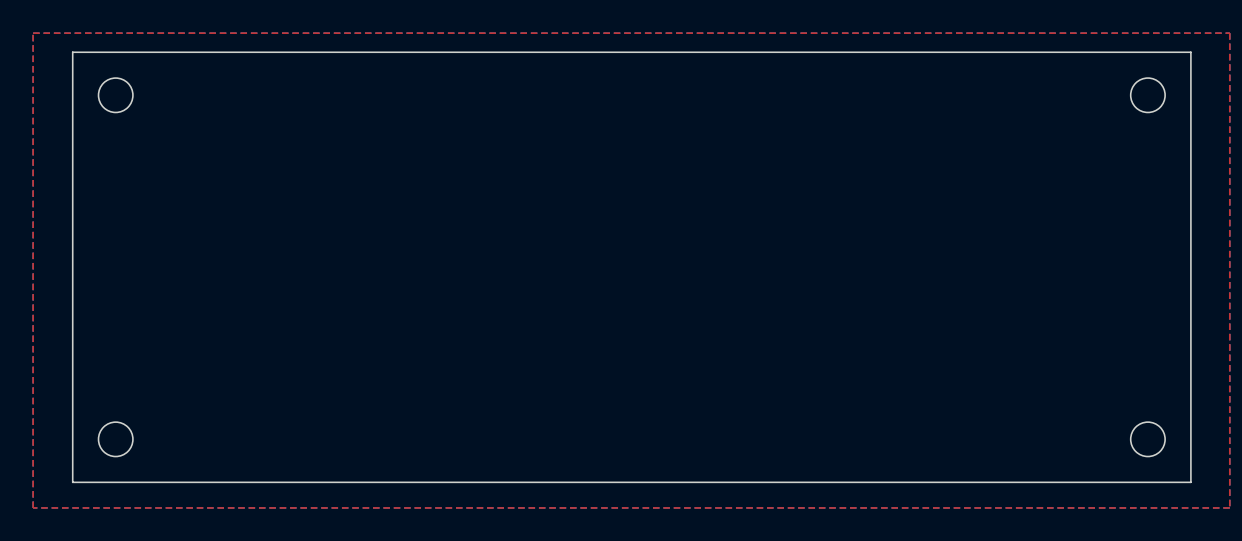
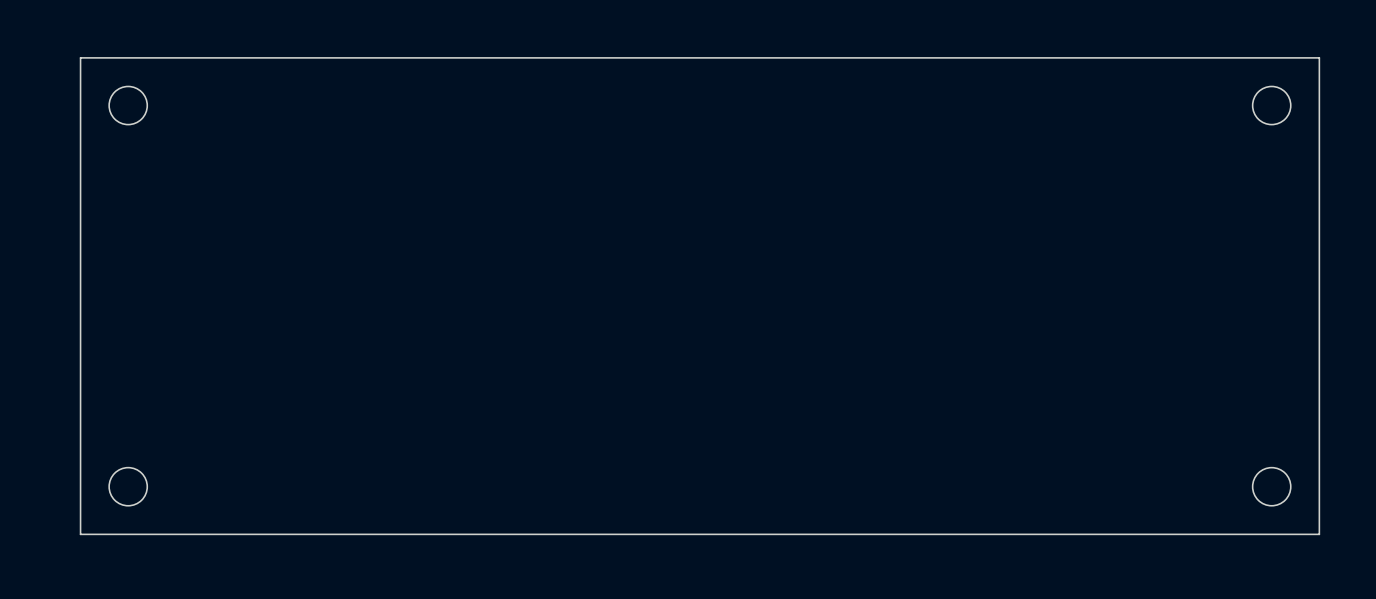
top zone outline: (33, 33) (33, 507) (1229, 507) (1229, 33) (33, 33) -> none

